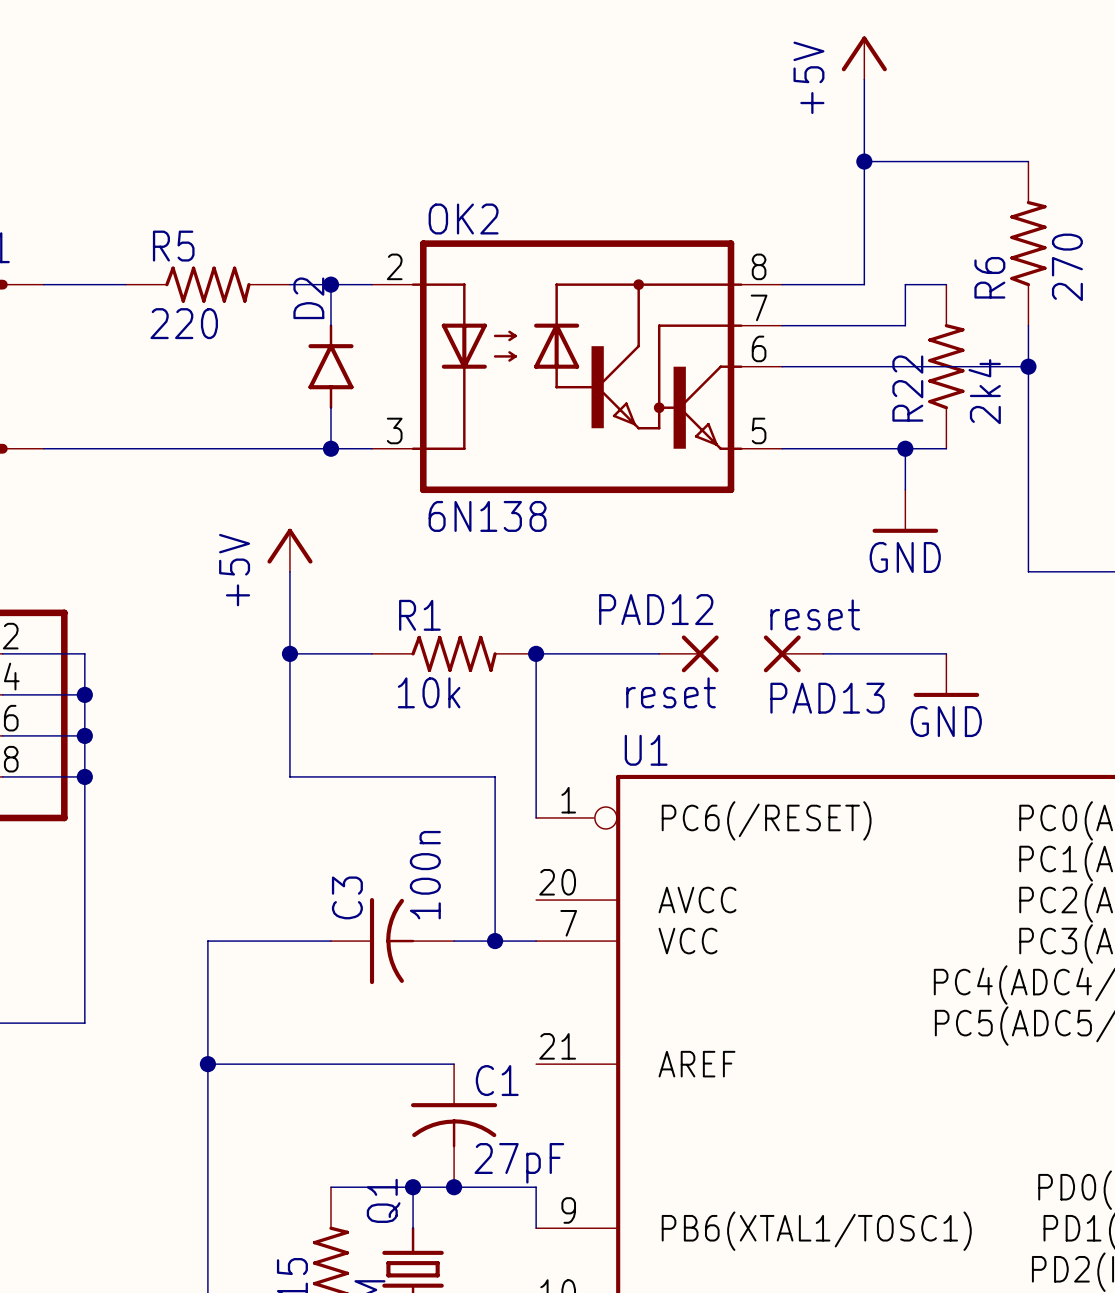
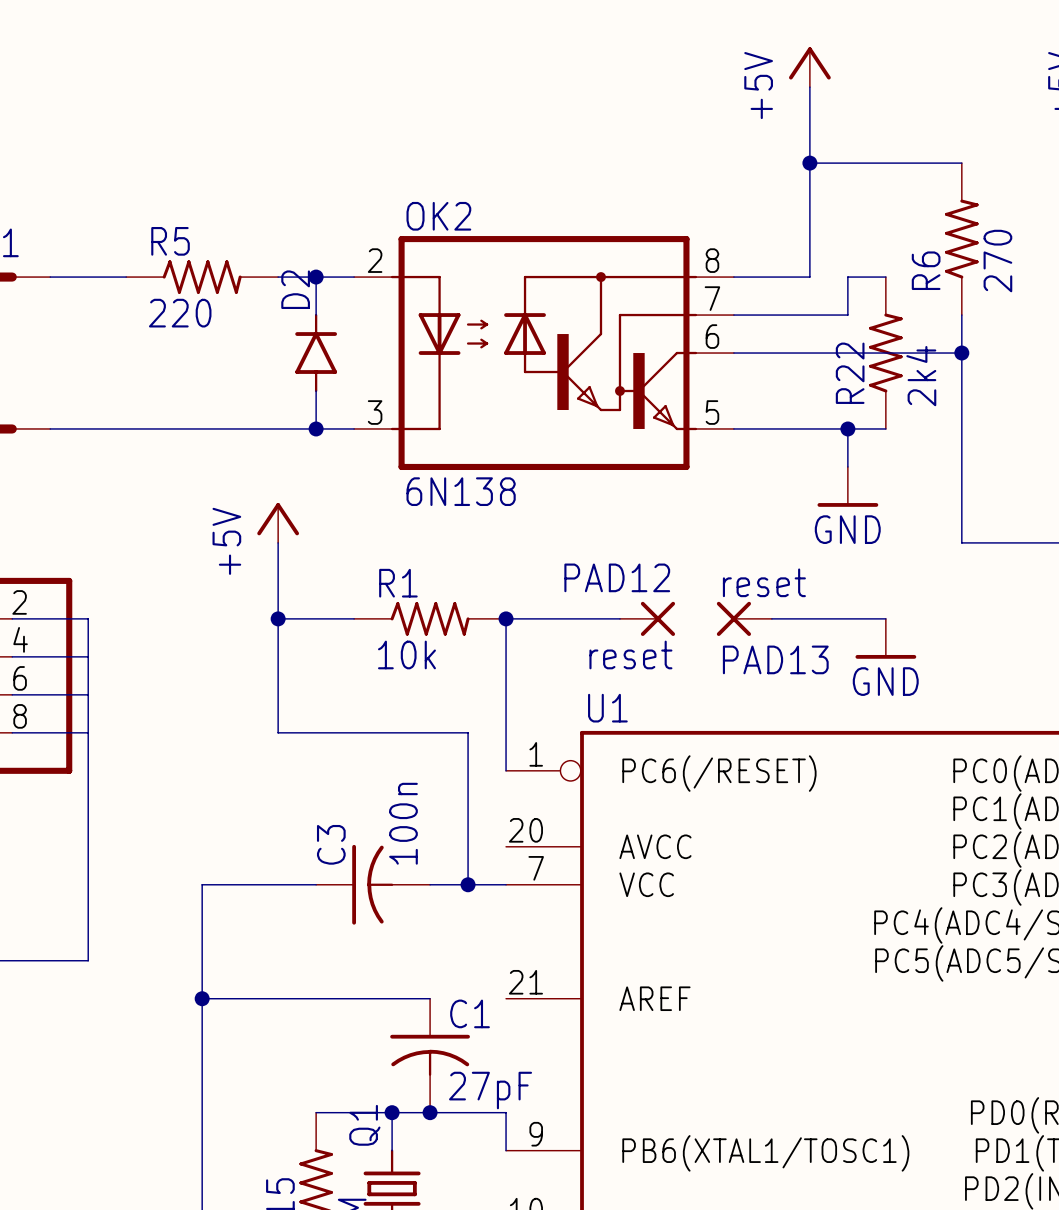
junction: (84, 694) -> none
junction: (84, 735) -> none
junction: (84, 776) -> none

